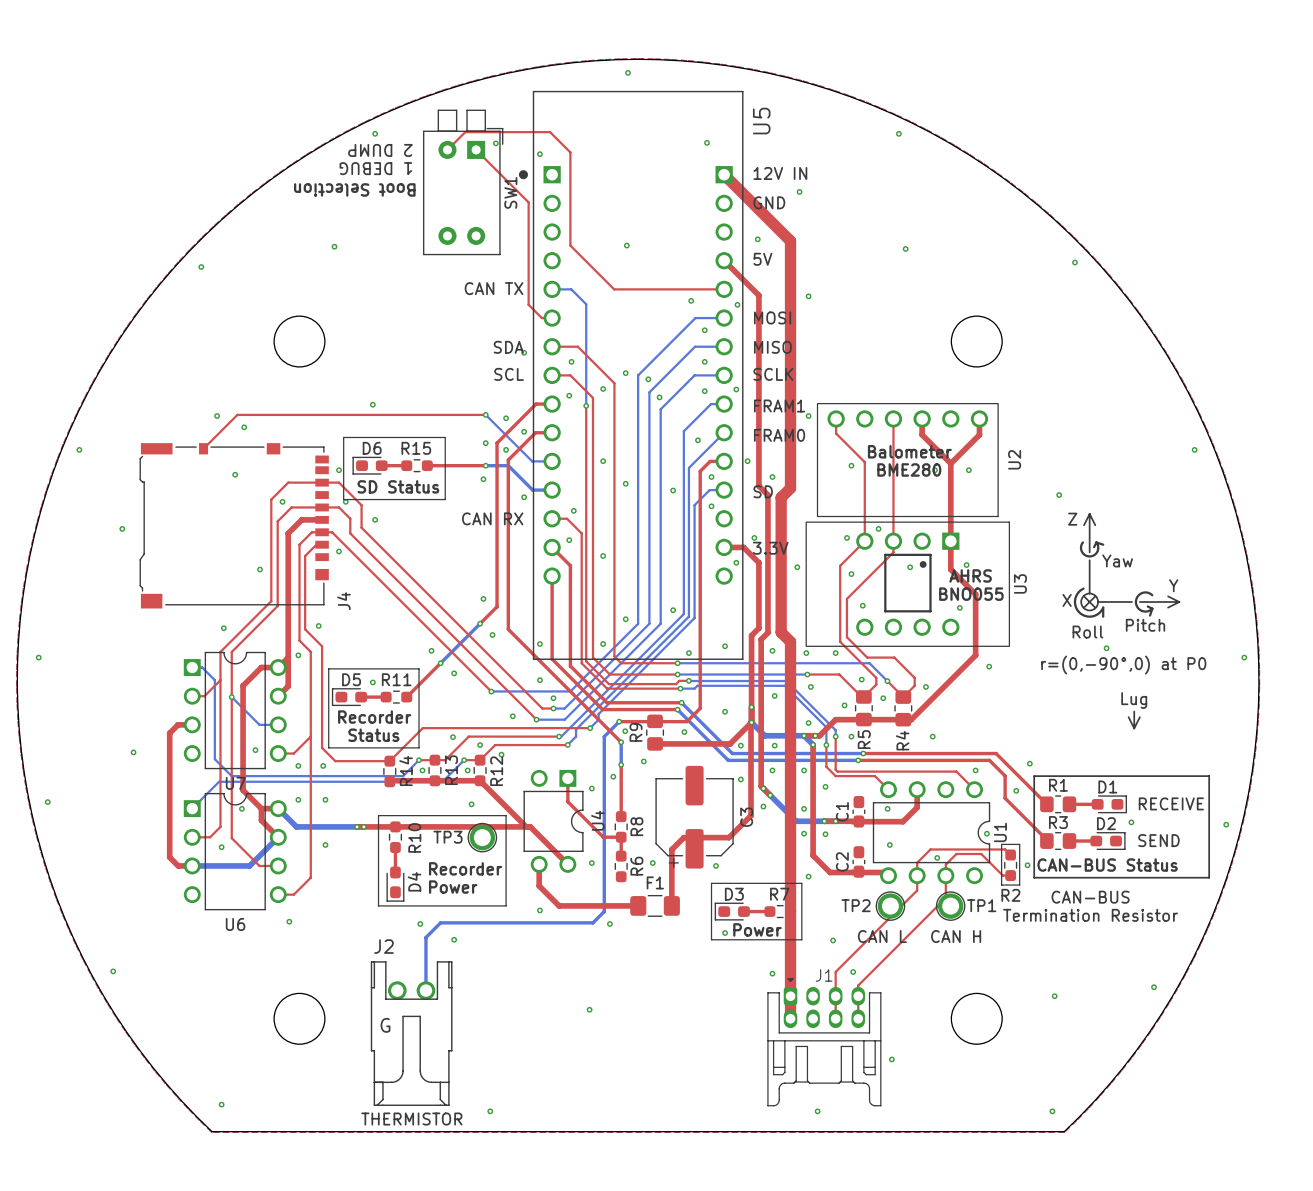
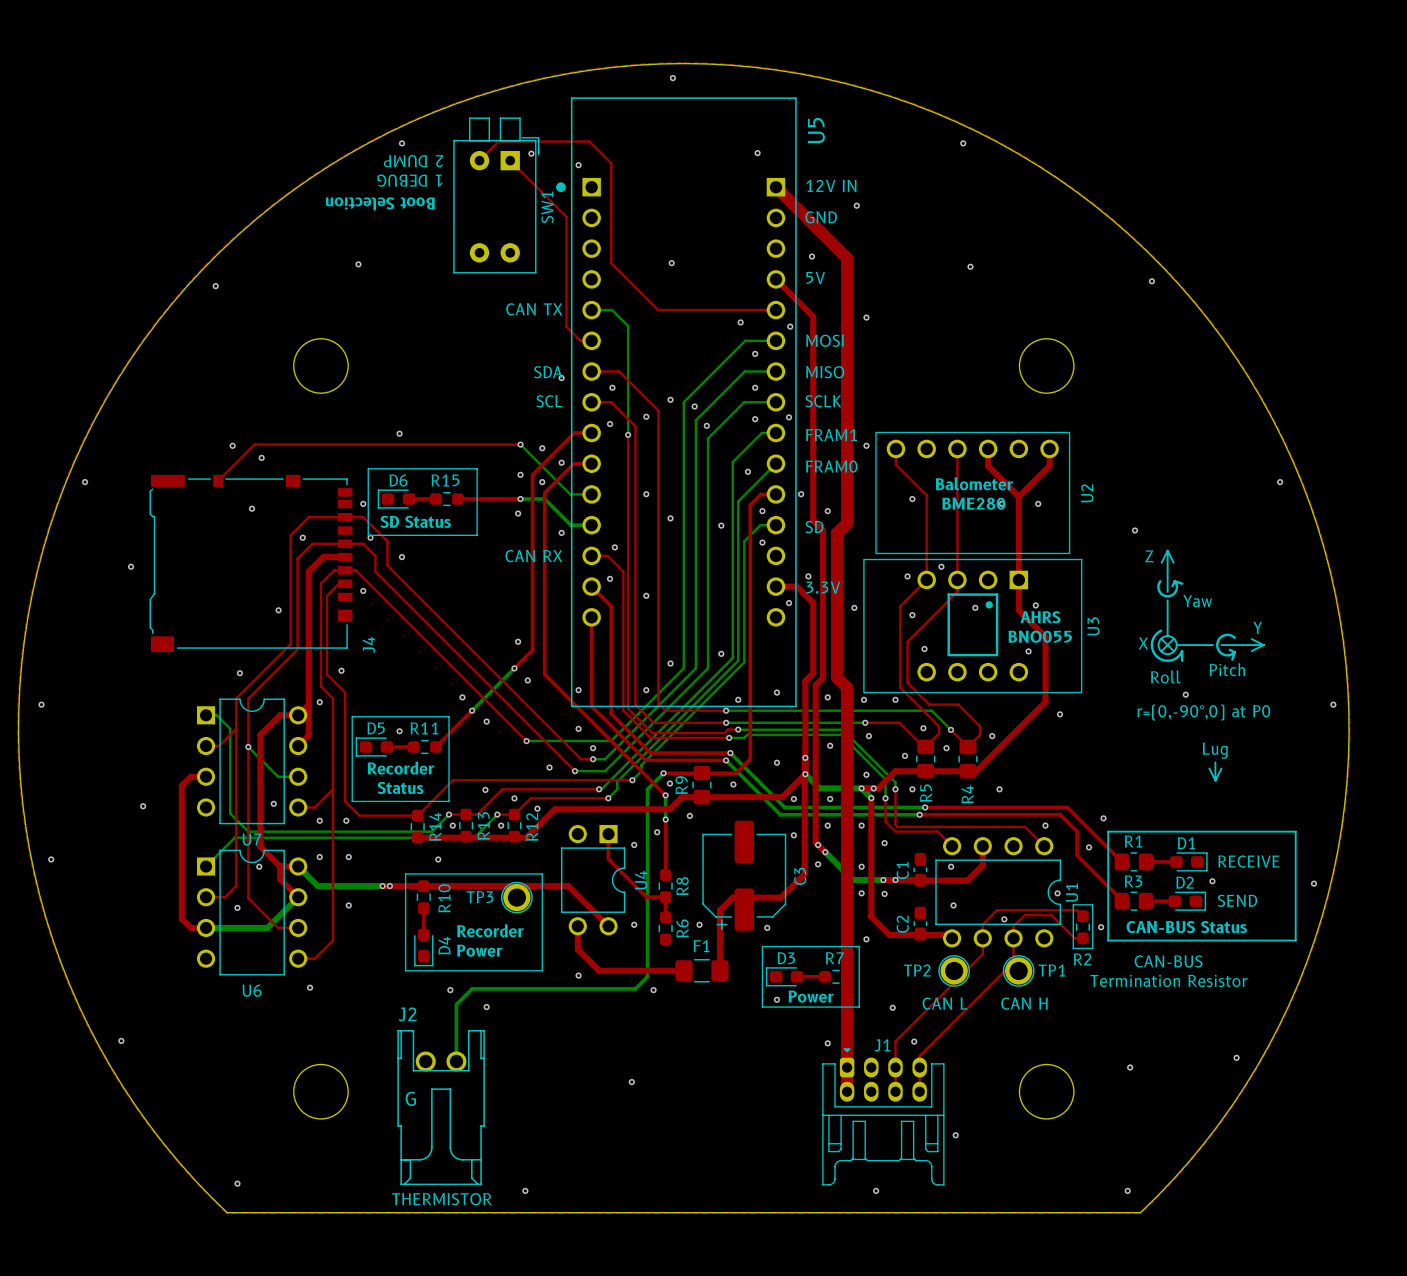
top track: none -> (701, 797) (682, 797) (669, 809) (554, 809) (526, 837) (417, 837)
top track: (390, 780) (480, 780) (526, 826) -> none
via position: (471, 804) -> (438, 859)

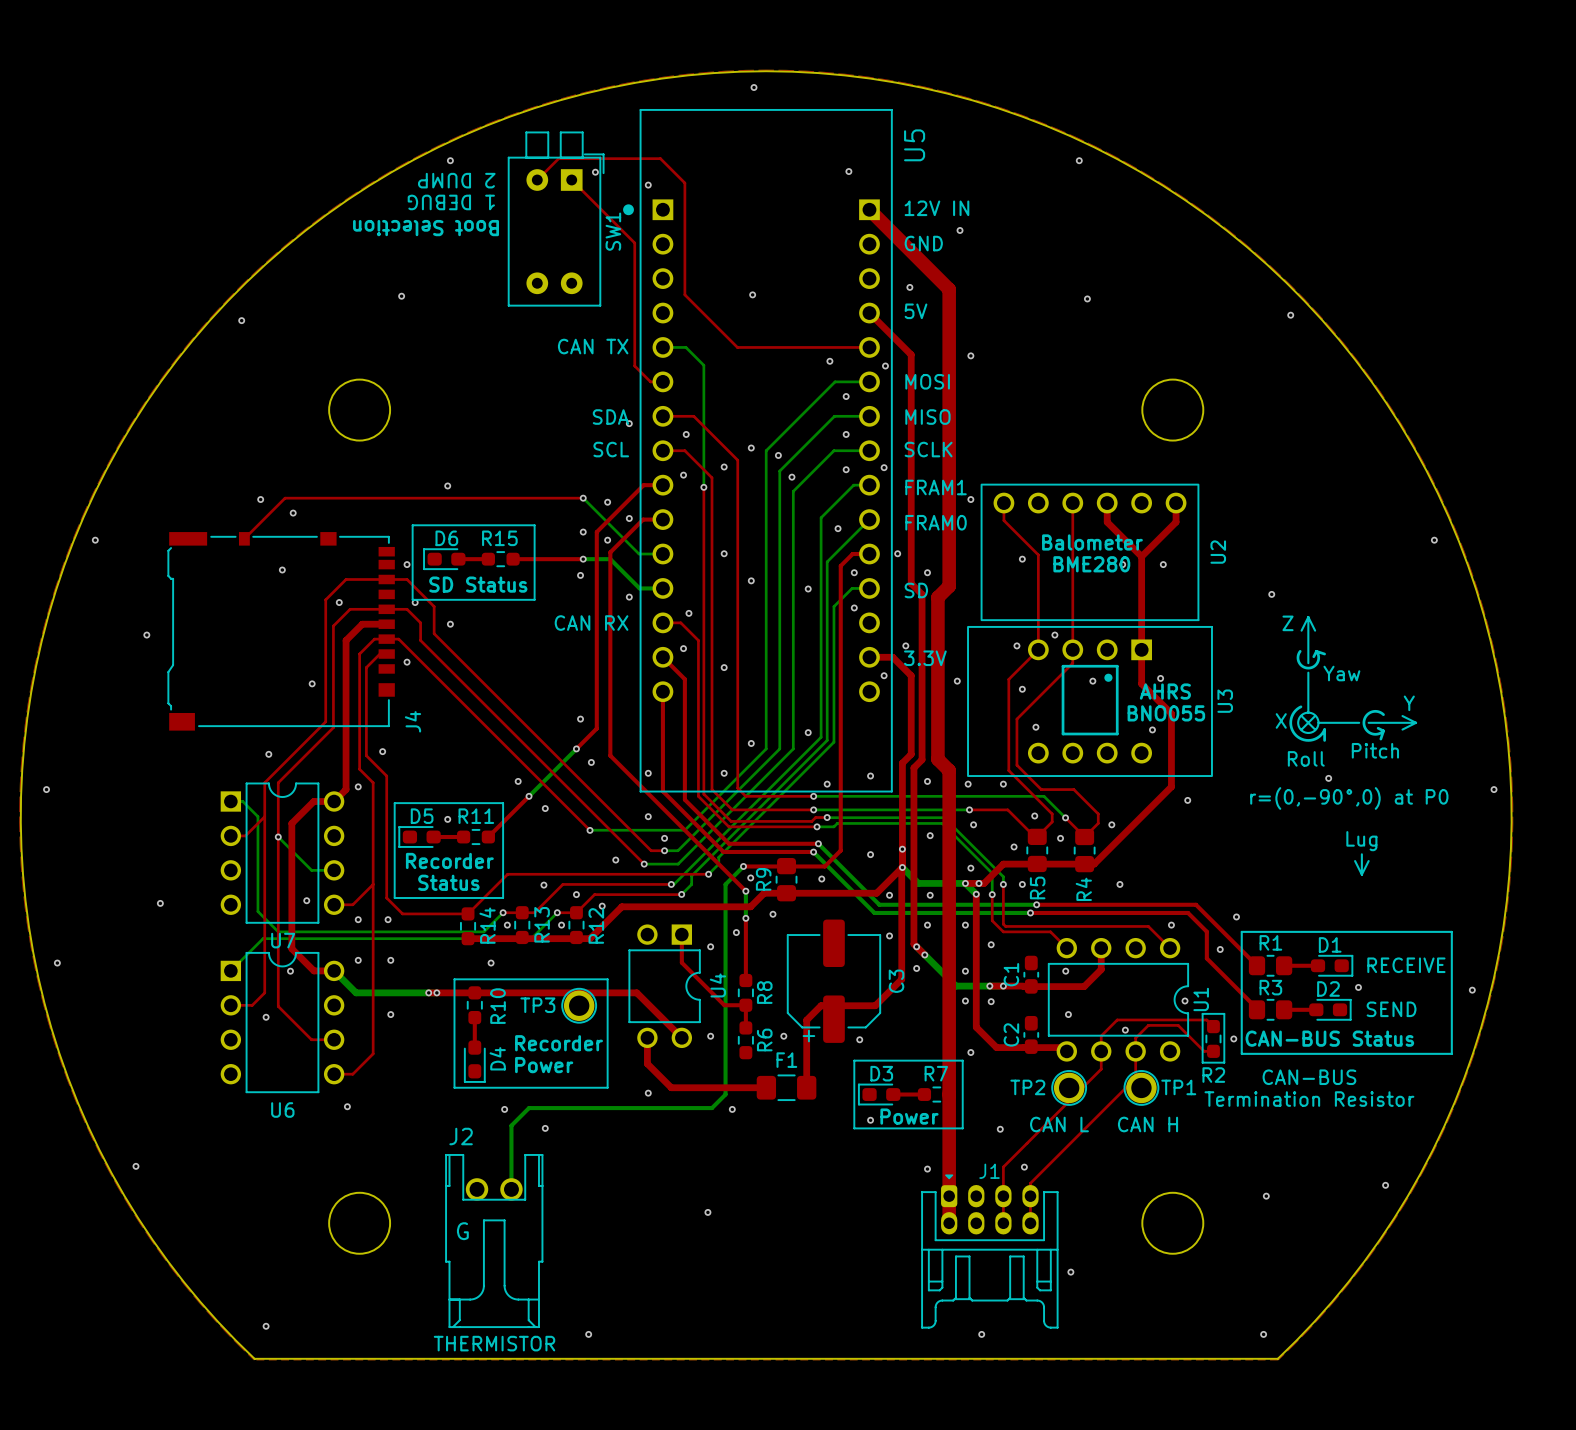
top track: (308, 704) (308, 735) (298, 746) -> none
top track: (206, 776) (190, 776) (181, 785) (181, 918) (191, 927) (206, 927) -> none
top track: (280, 866) (280, 879) (298, 897) -> none
bottom track: (298, 897) (267, 927) (206, 927) -> none

